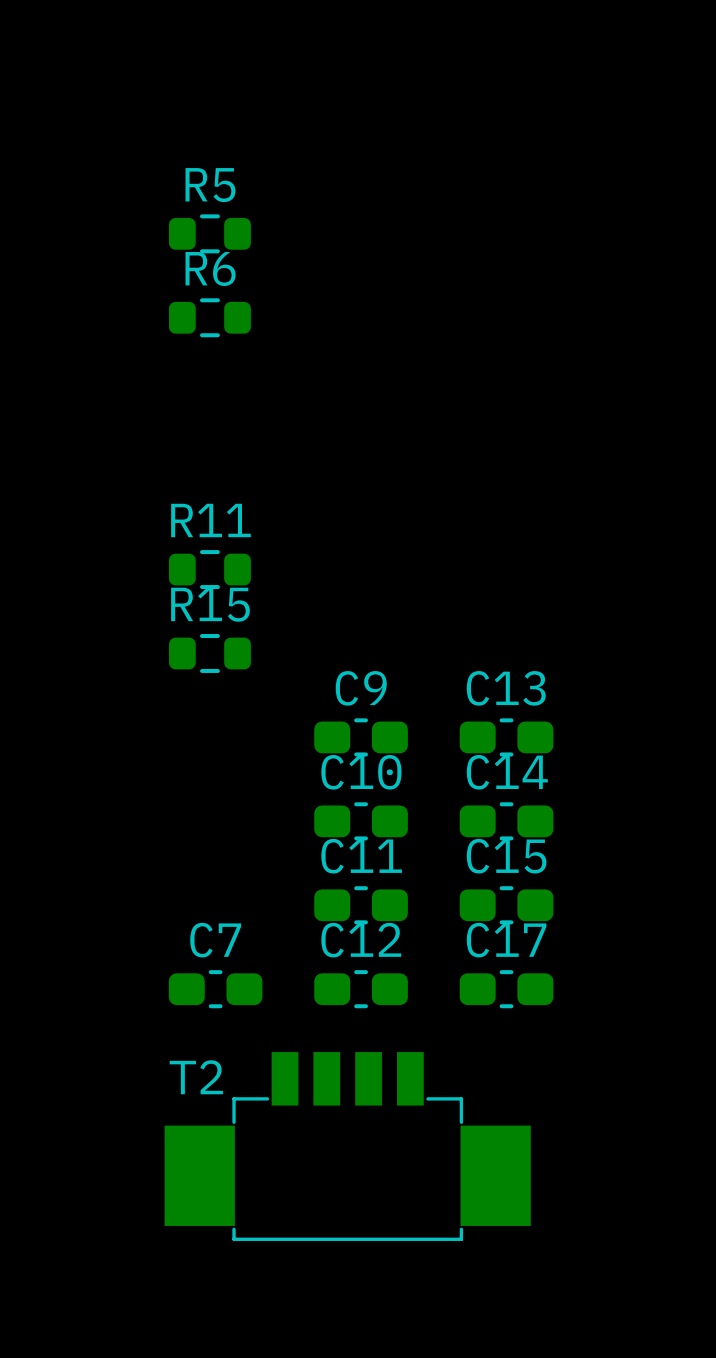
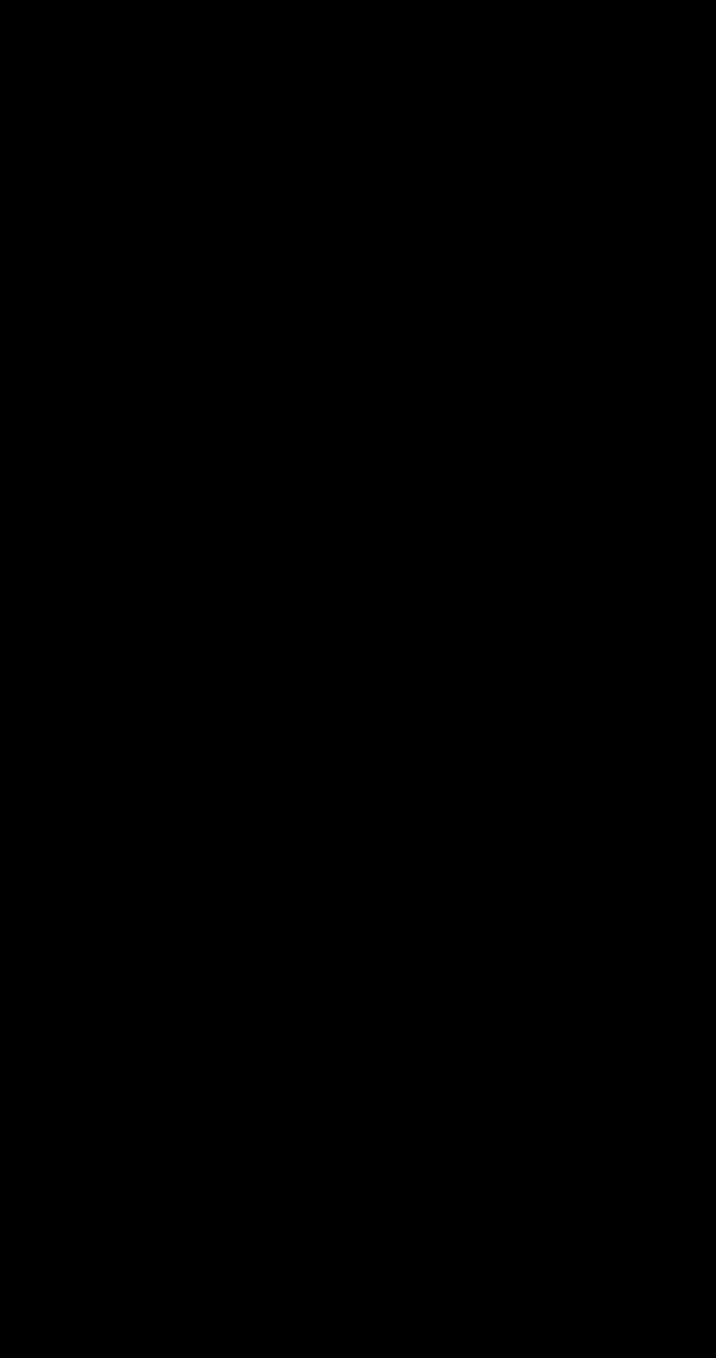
R5: (209, 233) -> none
R6: (209, 317) -> none
R11: (209, 569) -> none
R15: (209, 653) -> none
C9: (361, 737) -> none
C13: (506, 737) -> none
C10: (361, 821) -> none
C14: (506, 821) -> none
C11: (361, 905) -> none
C15: (506, 905) -> none
C7: (215, 989) -> none
C12: (361, 989) -> none
C17: (506, 989) -> none
T2: (347, 1146) -> none

